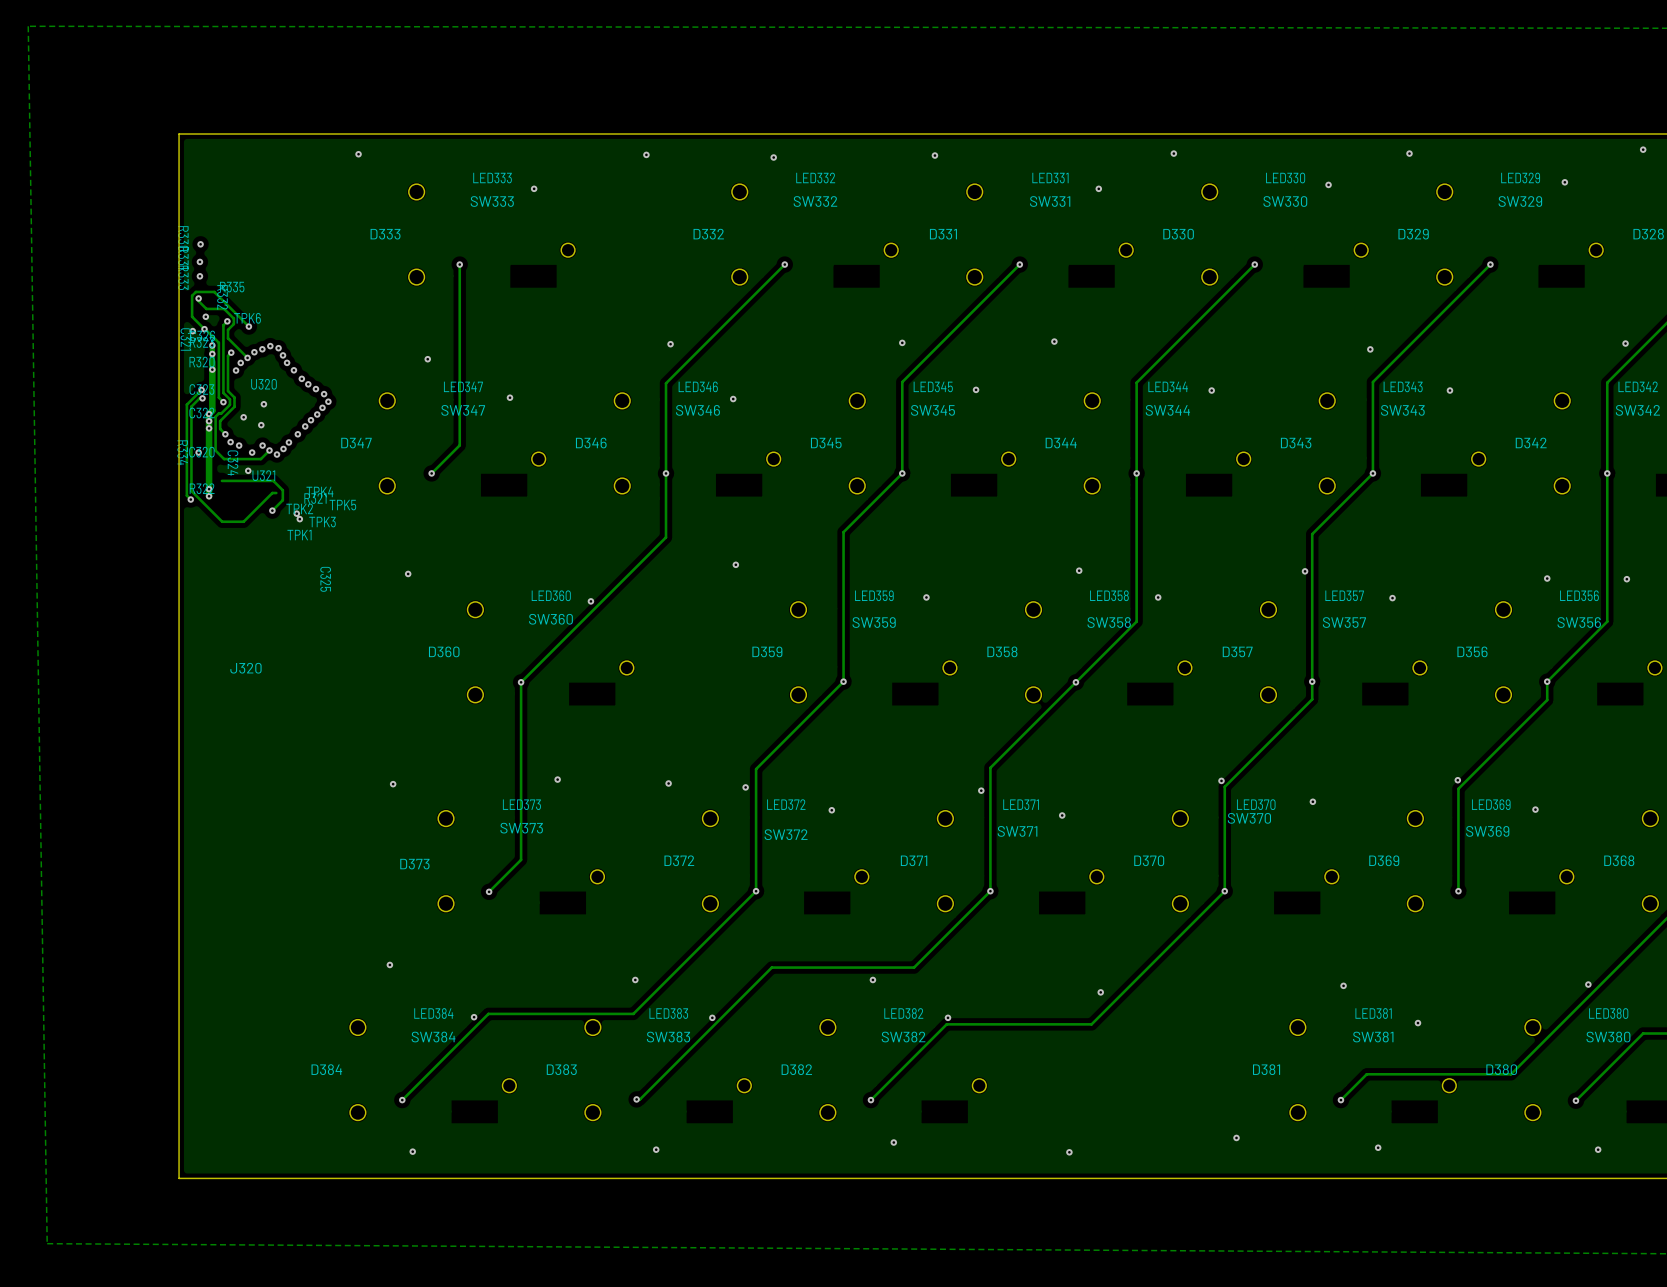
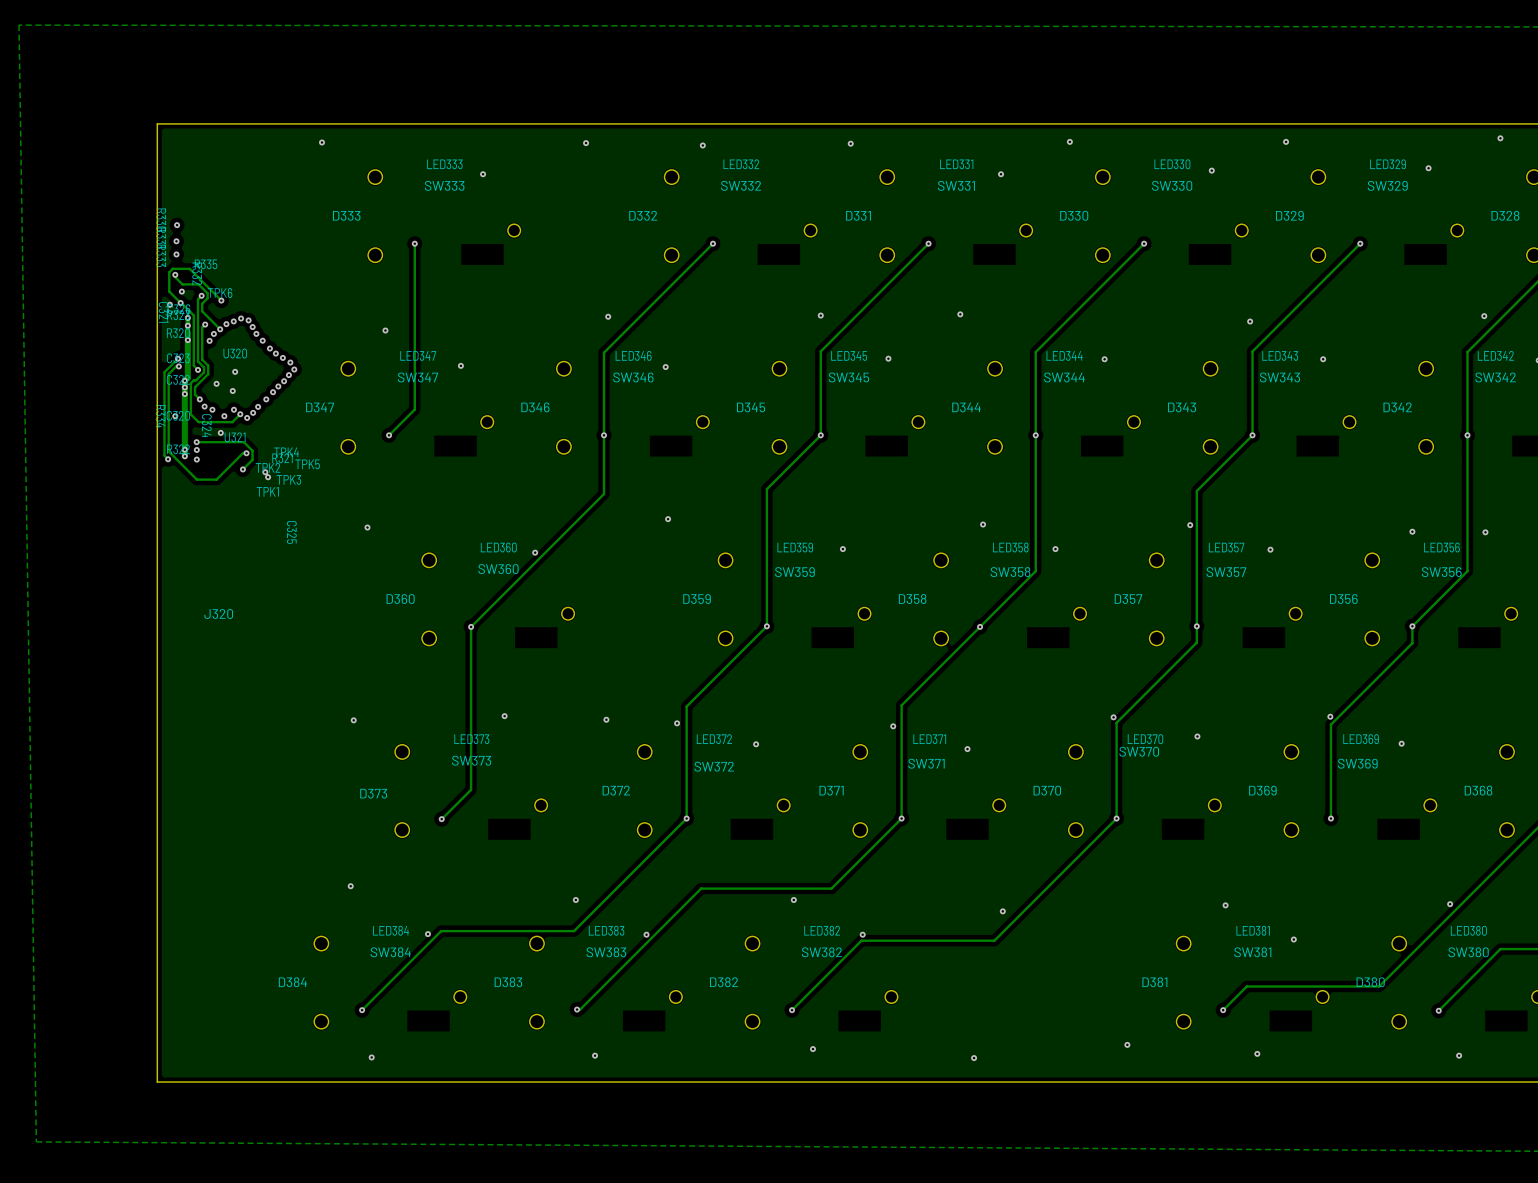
via: none -> (196, 442)
via: none -> (196, 449)
via: none -> (246, 453)
via: none -> (196, 459)

